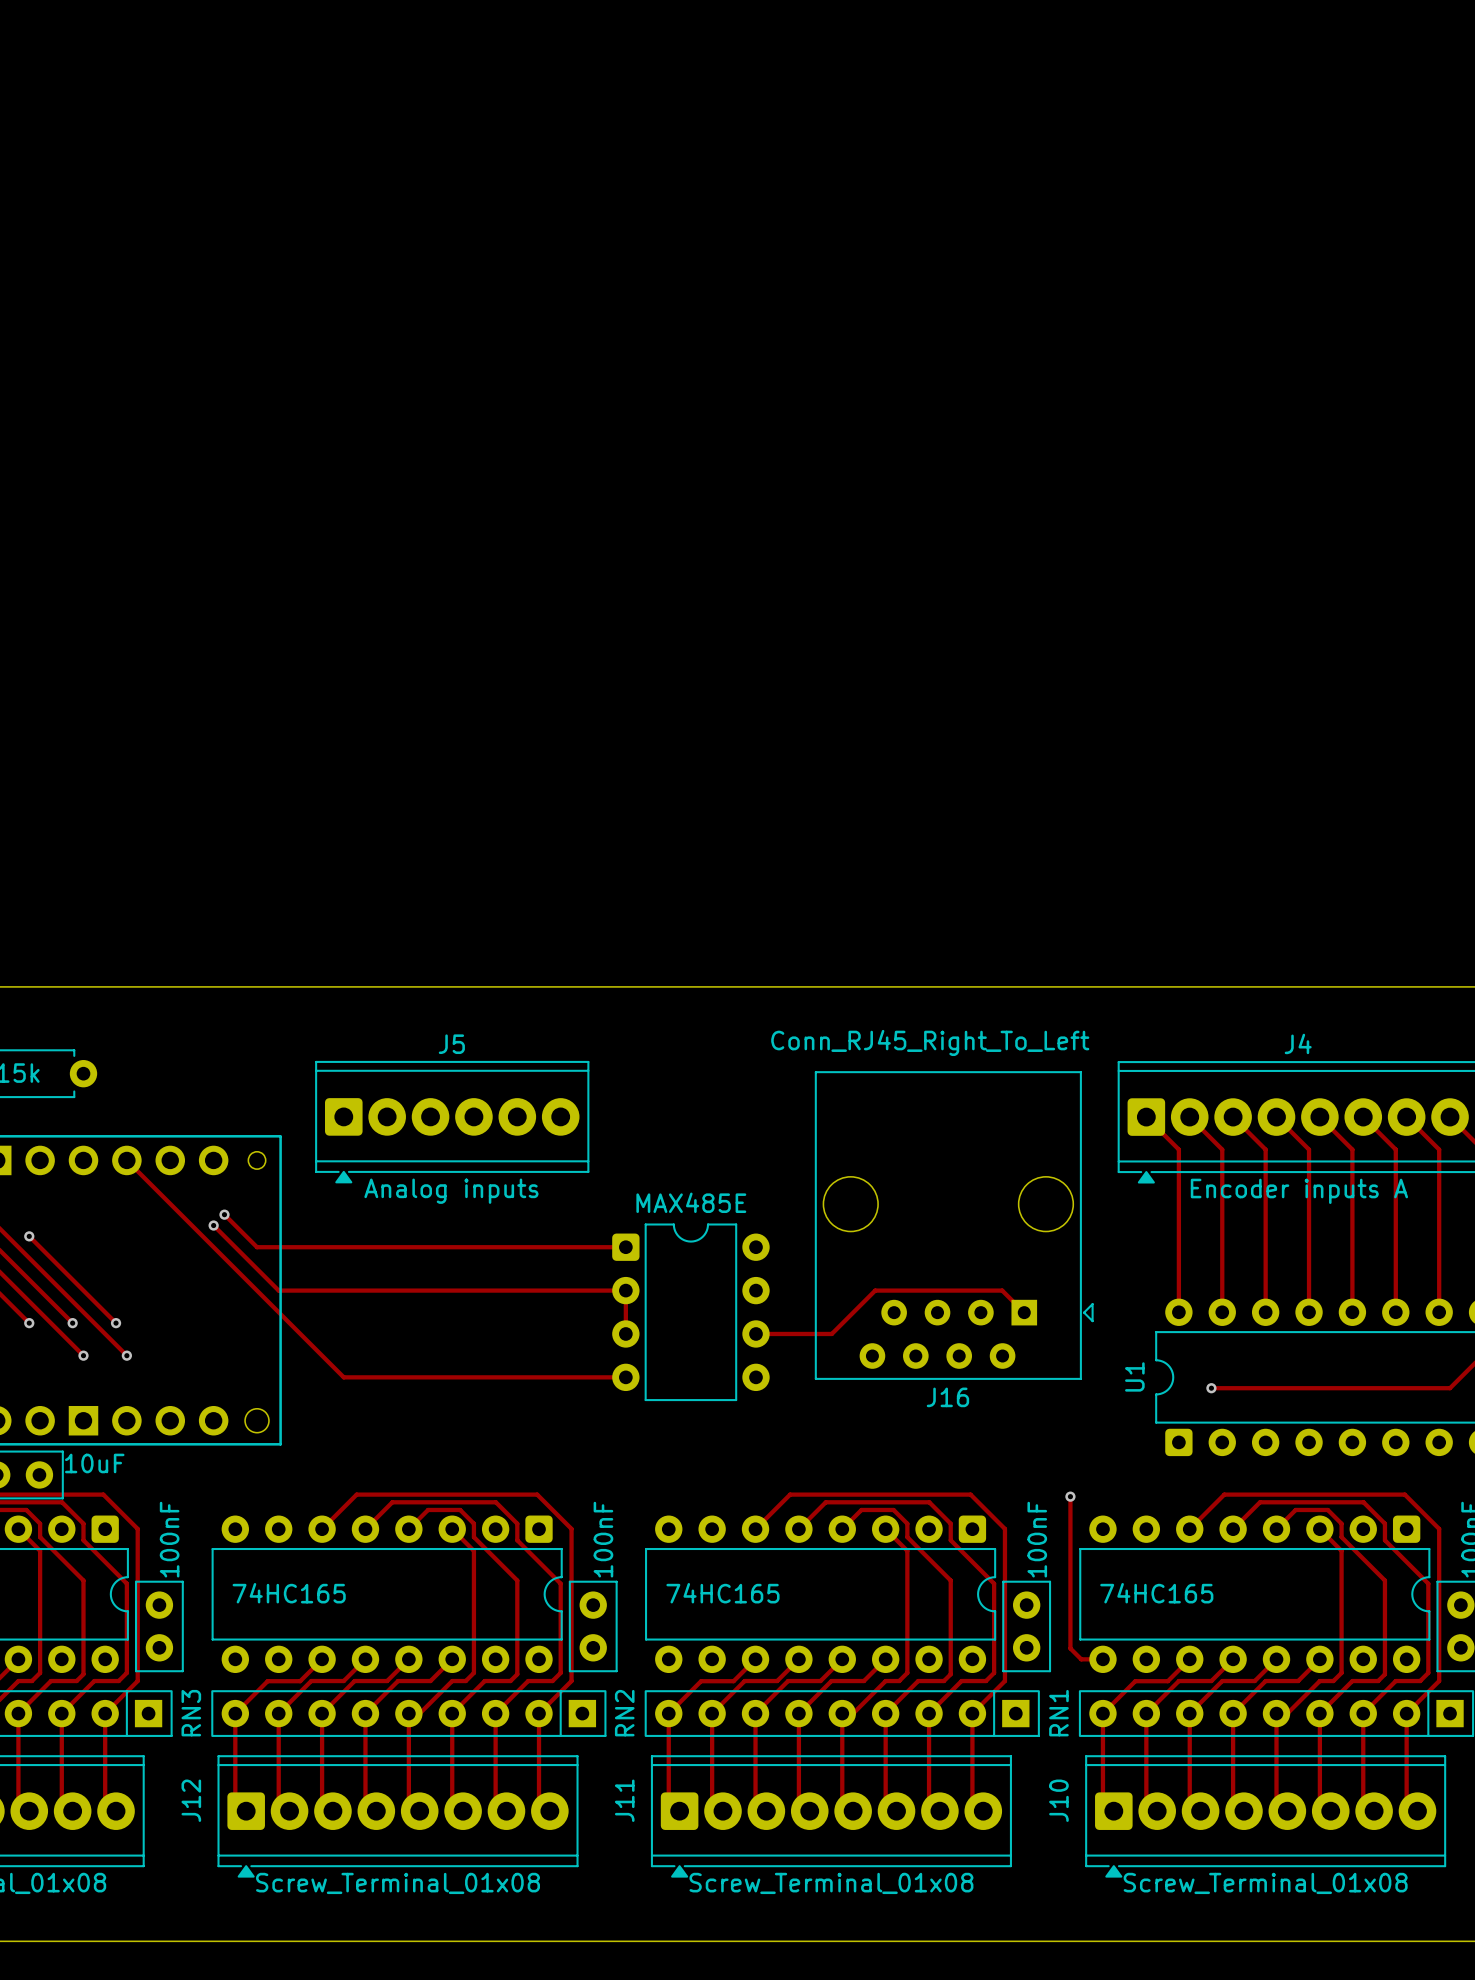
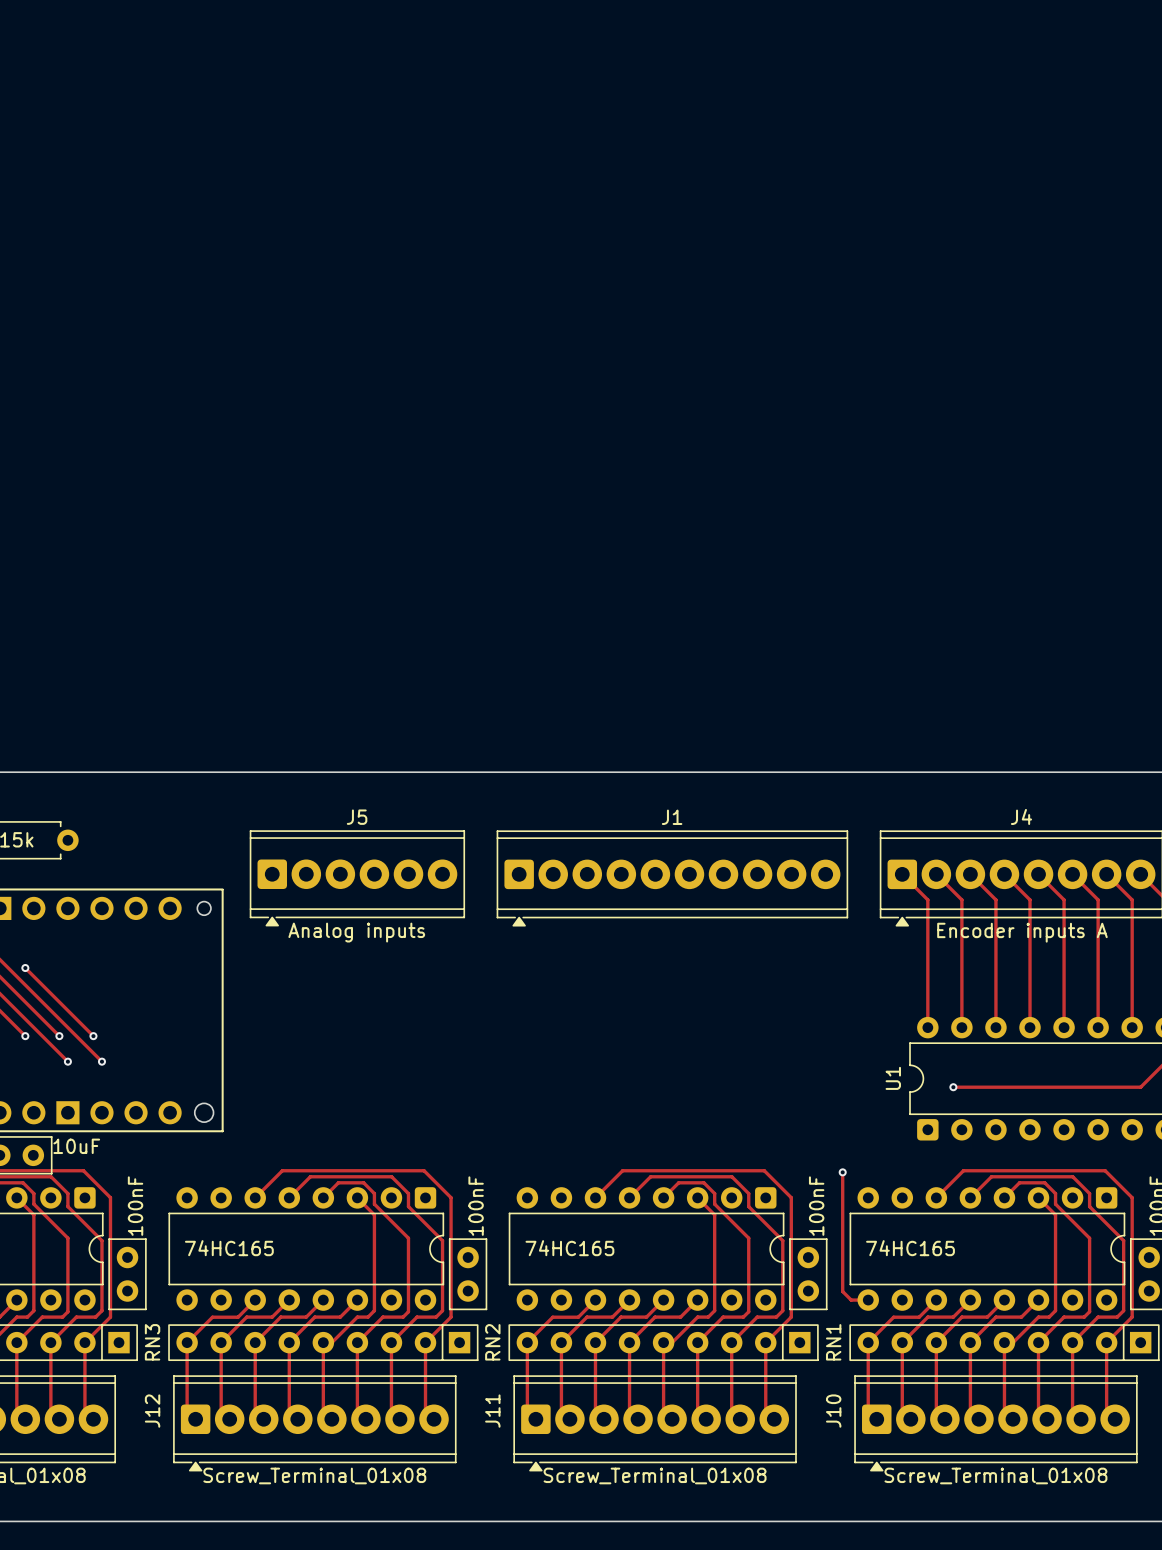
J1: none -> (672, 878)
track: (126, 1160) (343, 1377) (625, 1377) -> none
track: (224, 1214) (257, 1247) (625, 1247) -> none
via: (224, 1214) -> none
track: (213, 1225) (278, 1290) (625, 1290) (625, 1333) -> none
via: (213, 1225) -> none
J16: Conn_RJ45_Right_To_Left (954, 1225) -> none
part: MAX485E (690, 1312) -> none
track: (1024, 1312) (1002, 1290) (875, 1290) (831, 1333) (756, 1333) -> none

